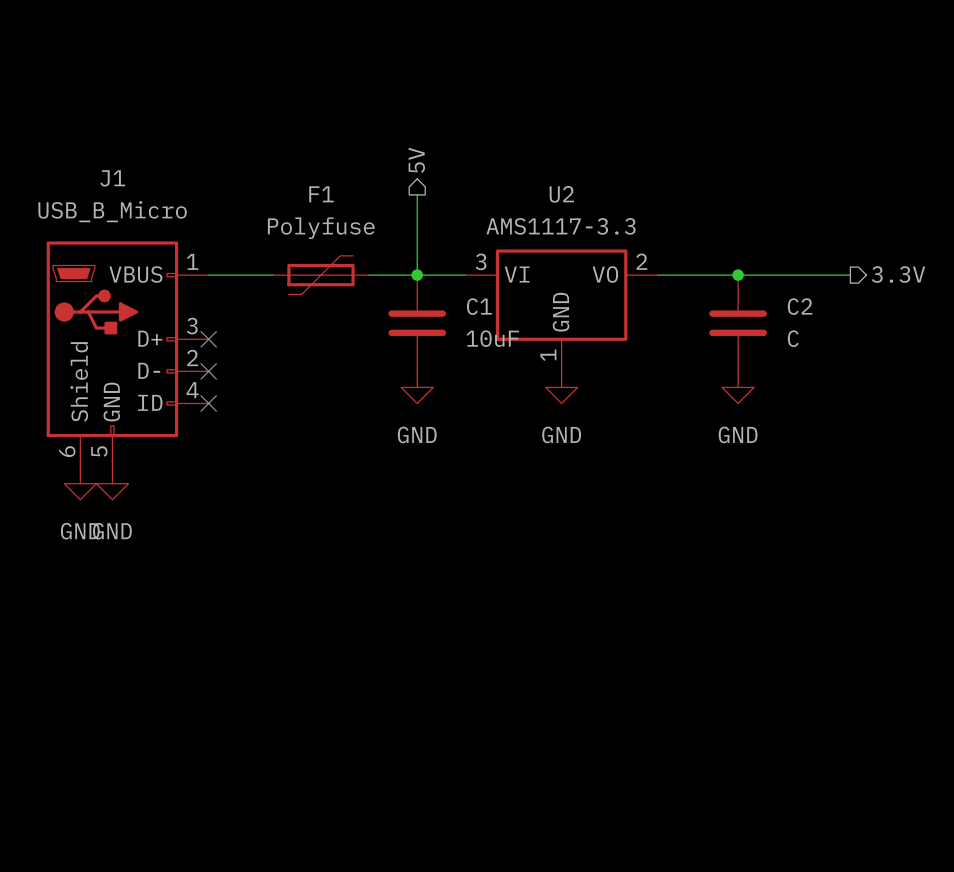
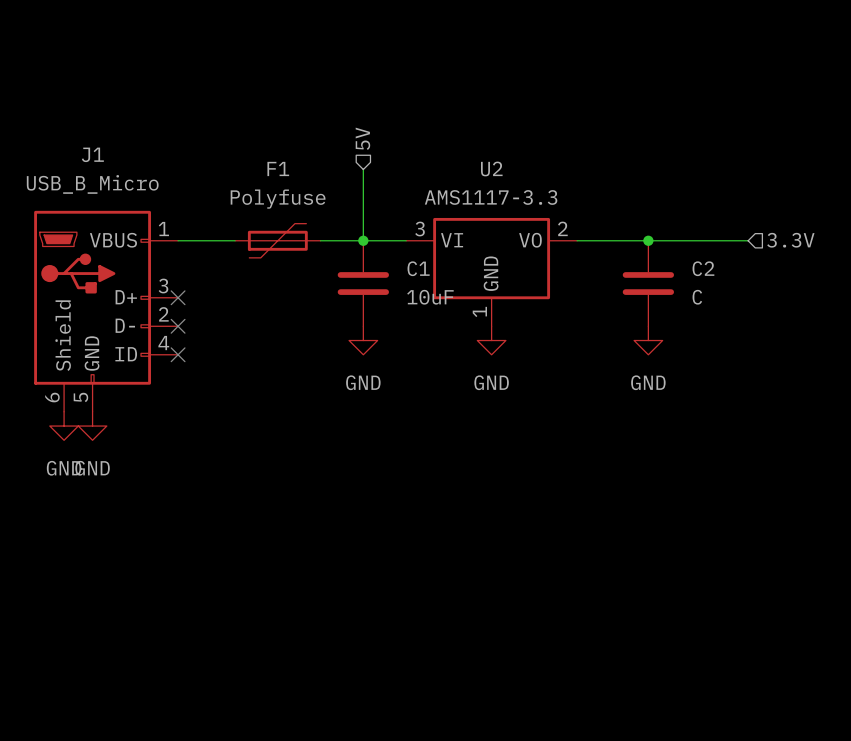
hierarchical label shape: output (416, 160) -> input (362, 138)
hierarchical label shape: output (898, 274) -> input (790, 240)

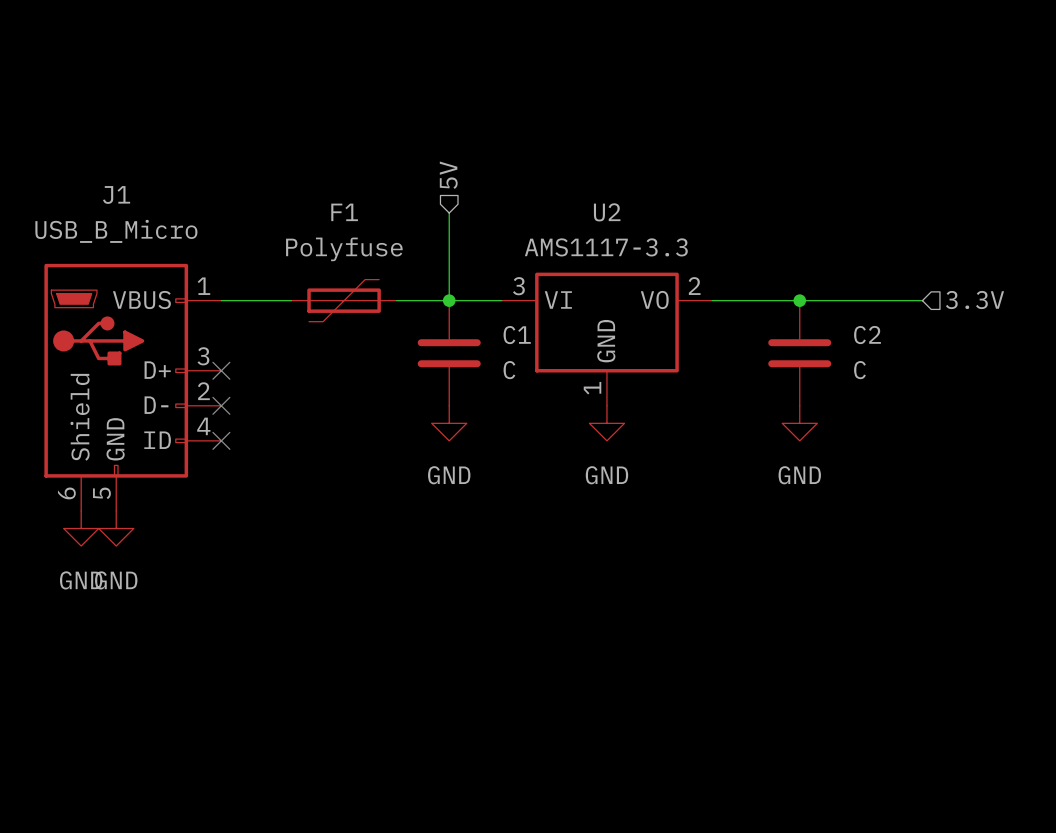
C1 value: 10uF (430, 297) -> C (509, 370)

